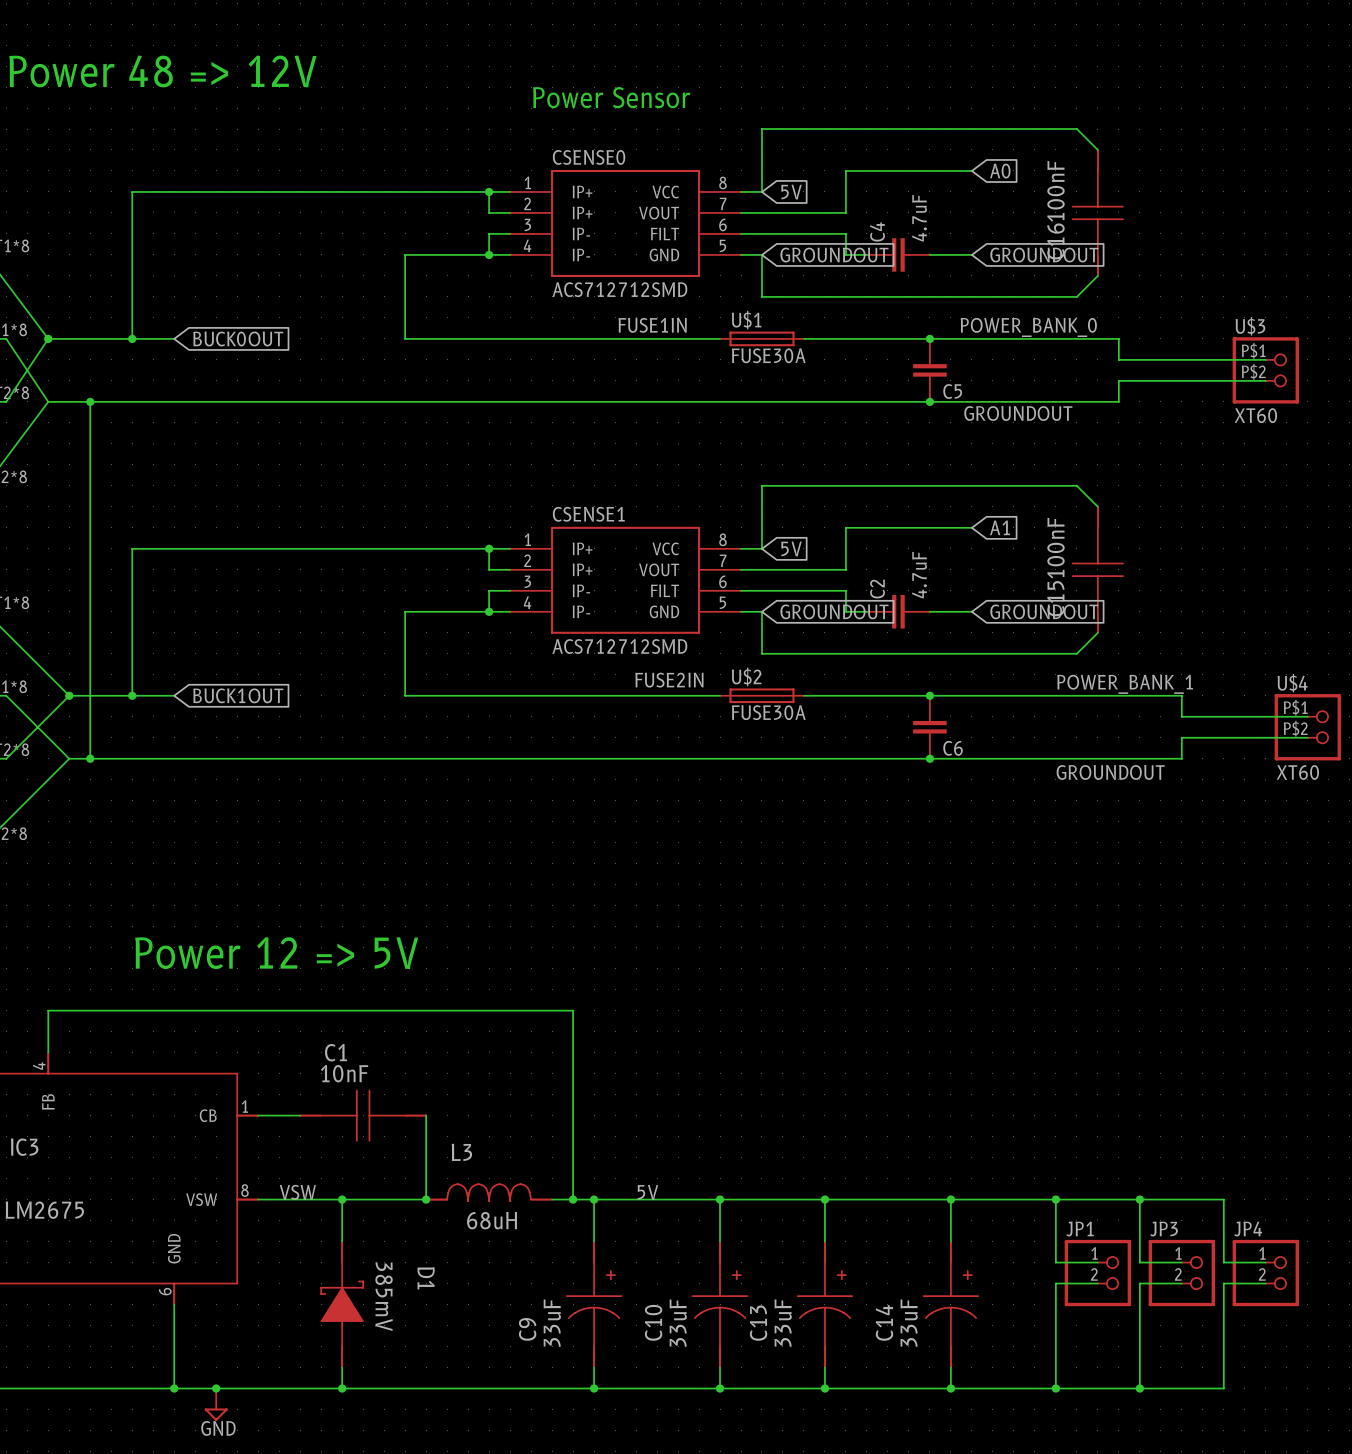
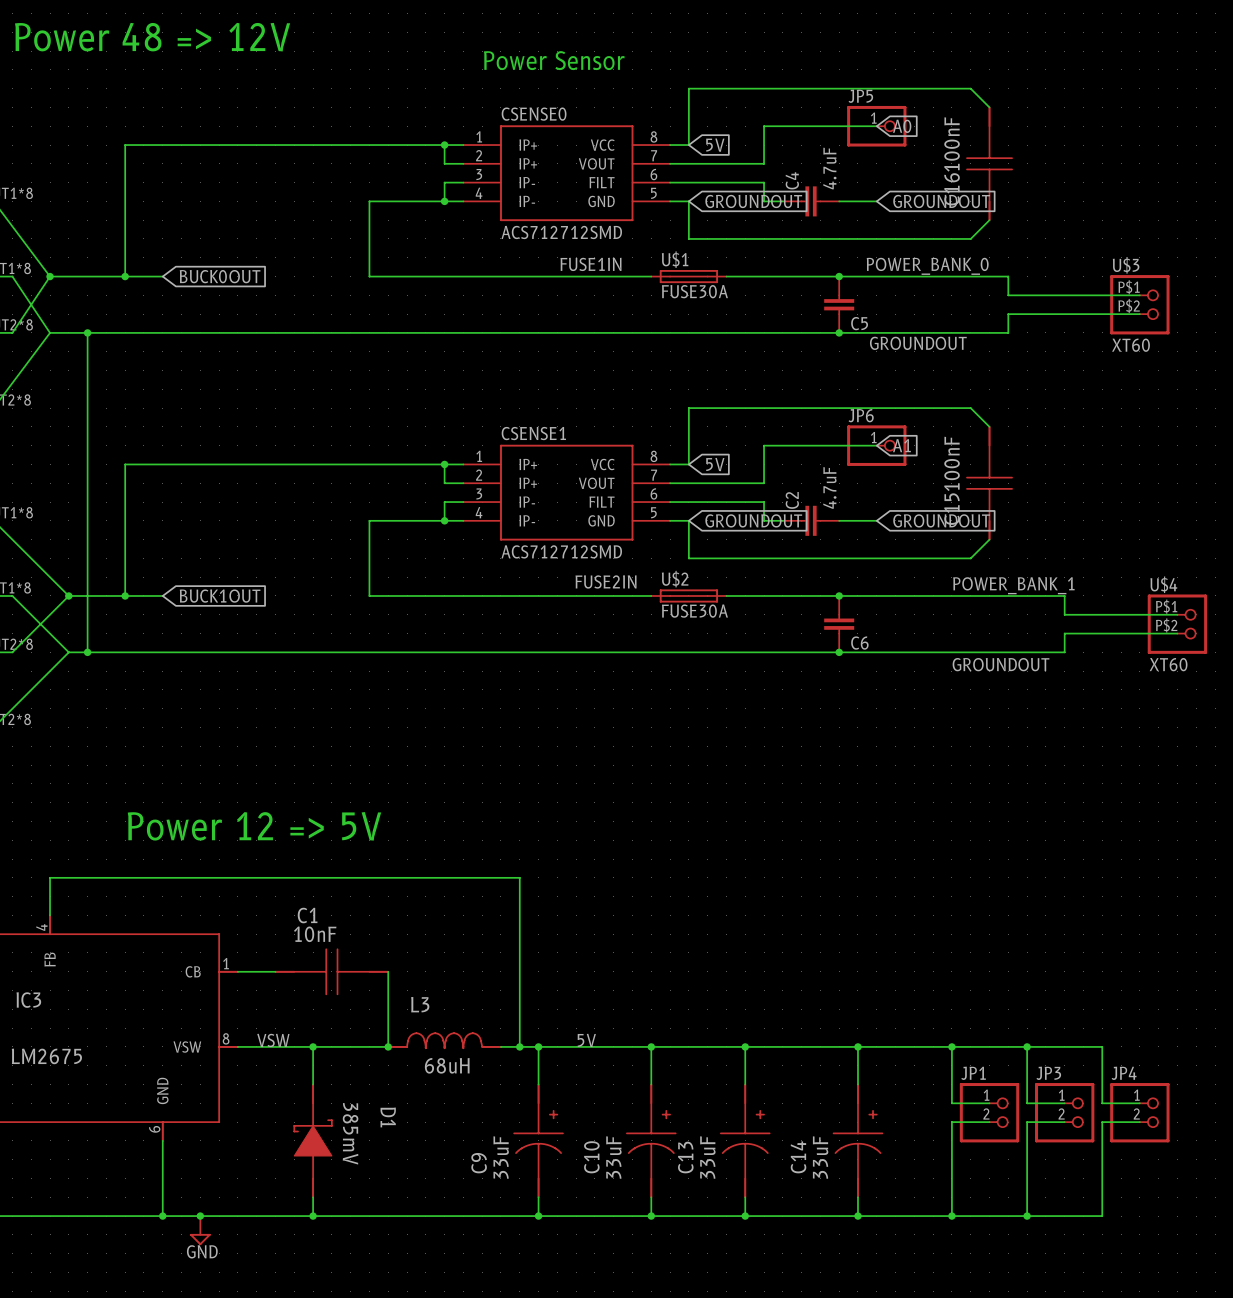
JP5: none -> (876, 126)
JP6: none -> (876, 445)

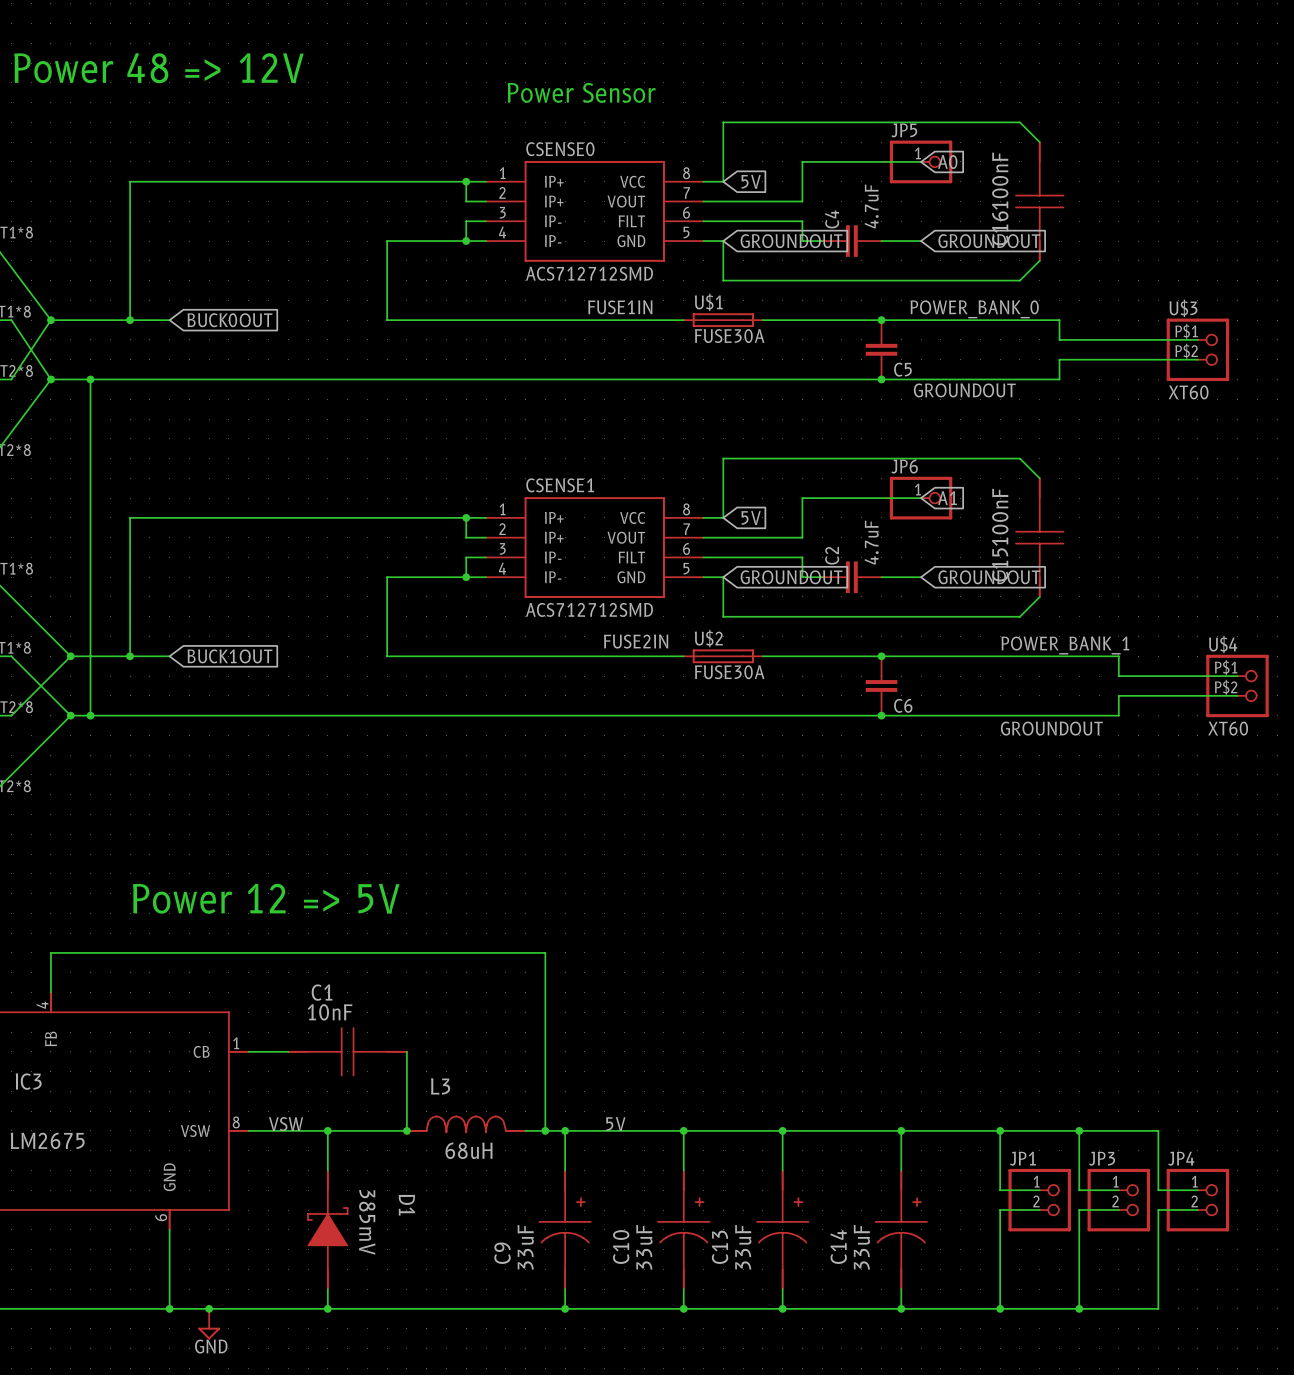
junction: none -> (50, 379)
junction: none -> (70, 715)

